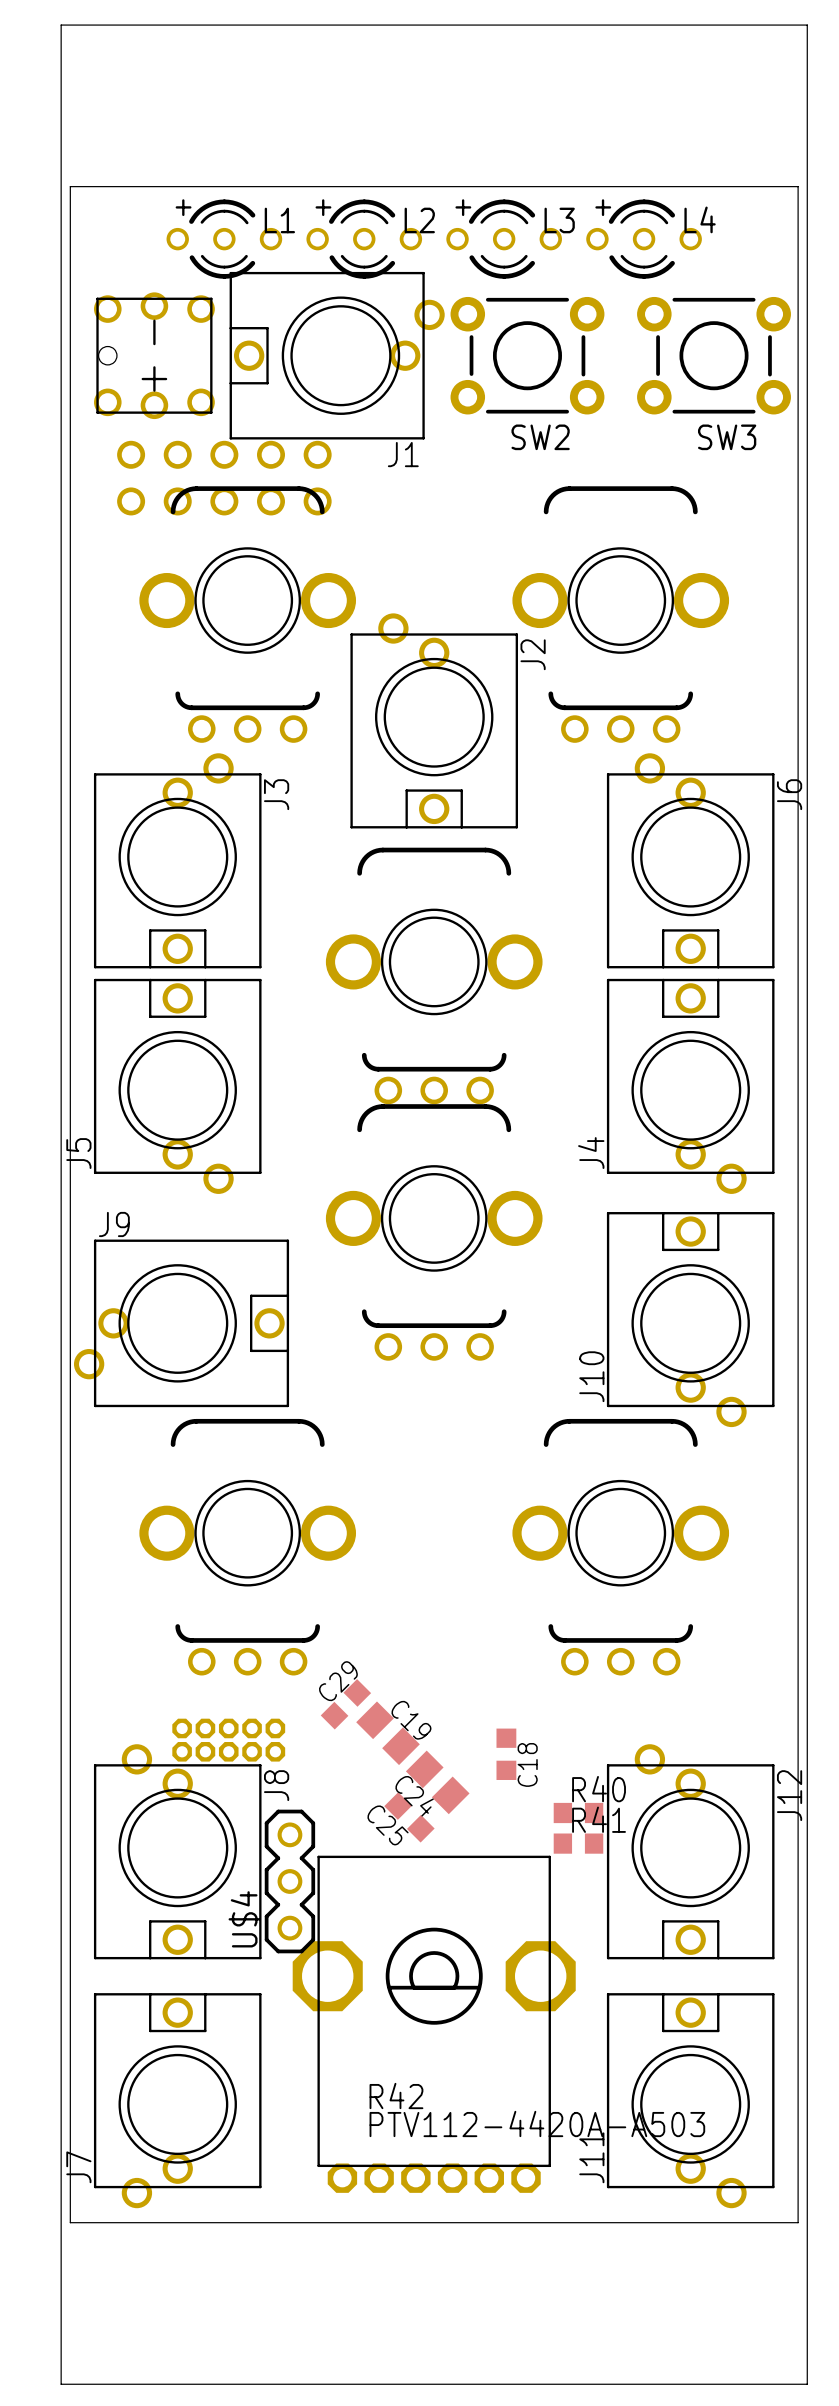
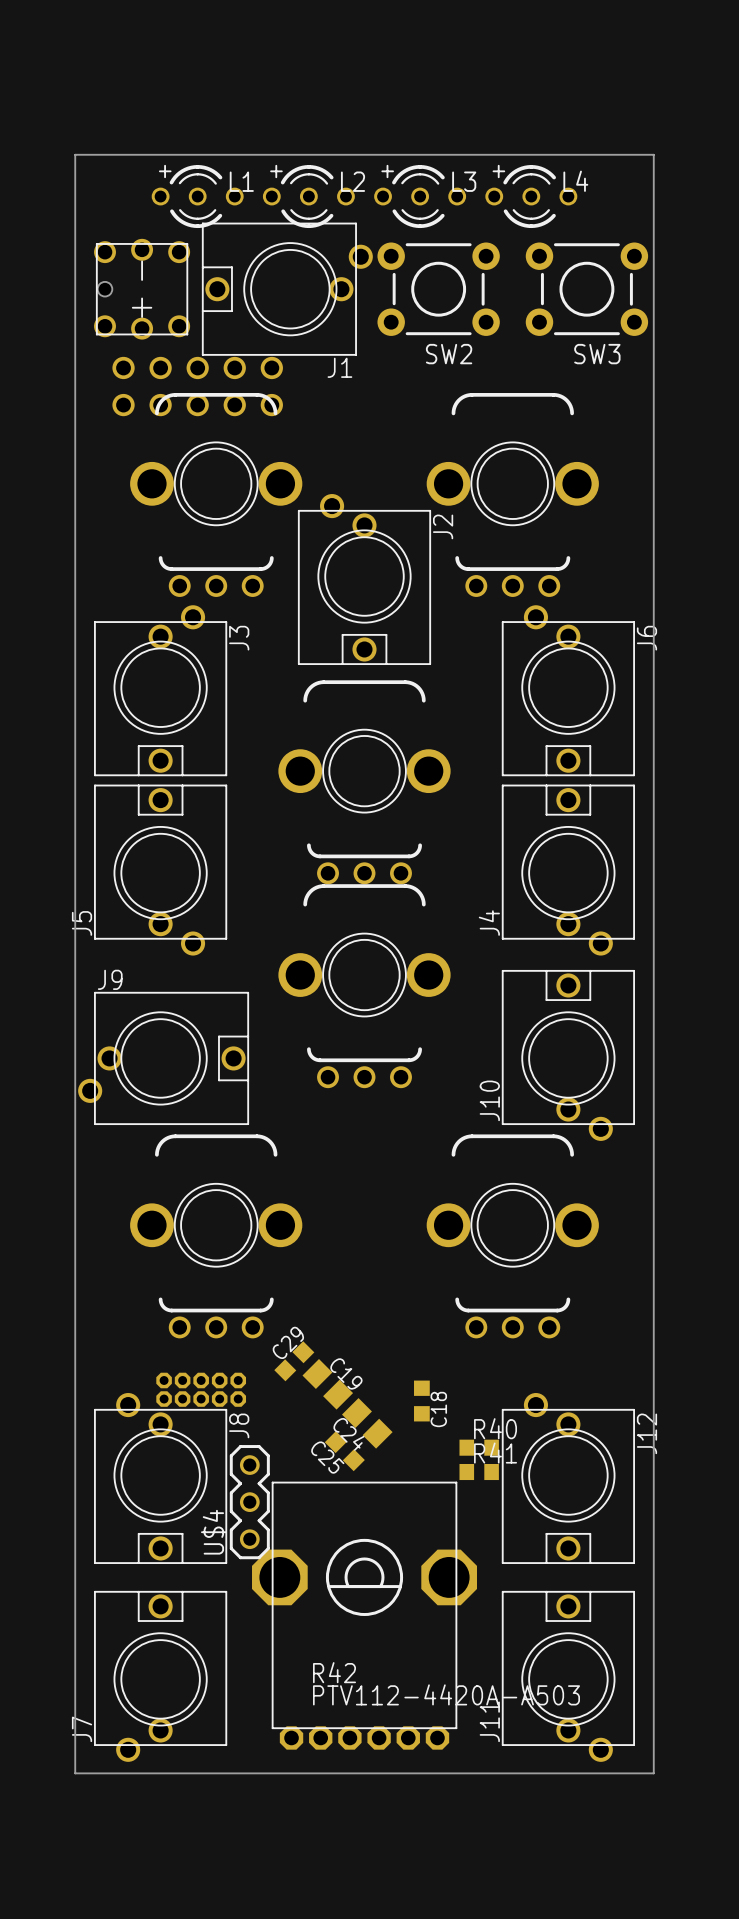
board edge: (61, 25) (807, 25) (807, 2384) (61, 2384) (61, 25) -> none

